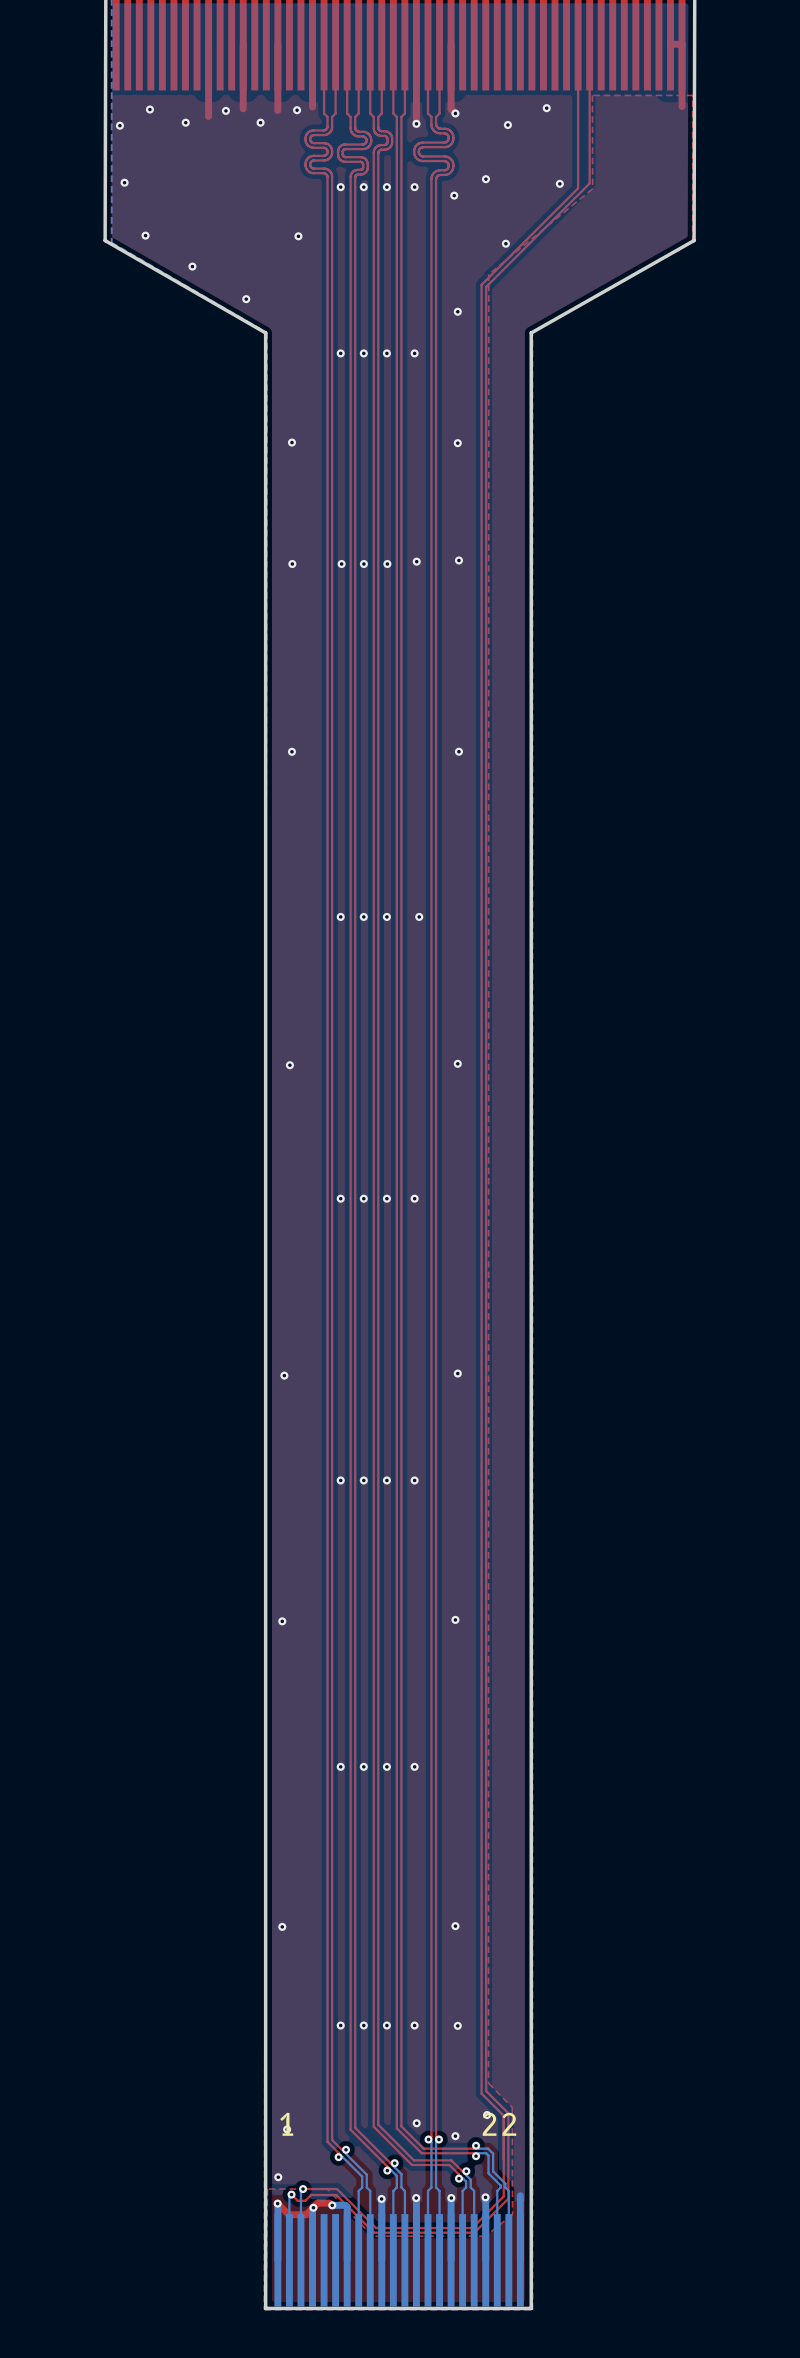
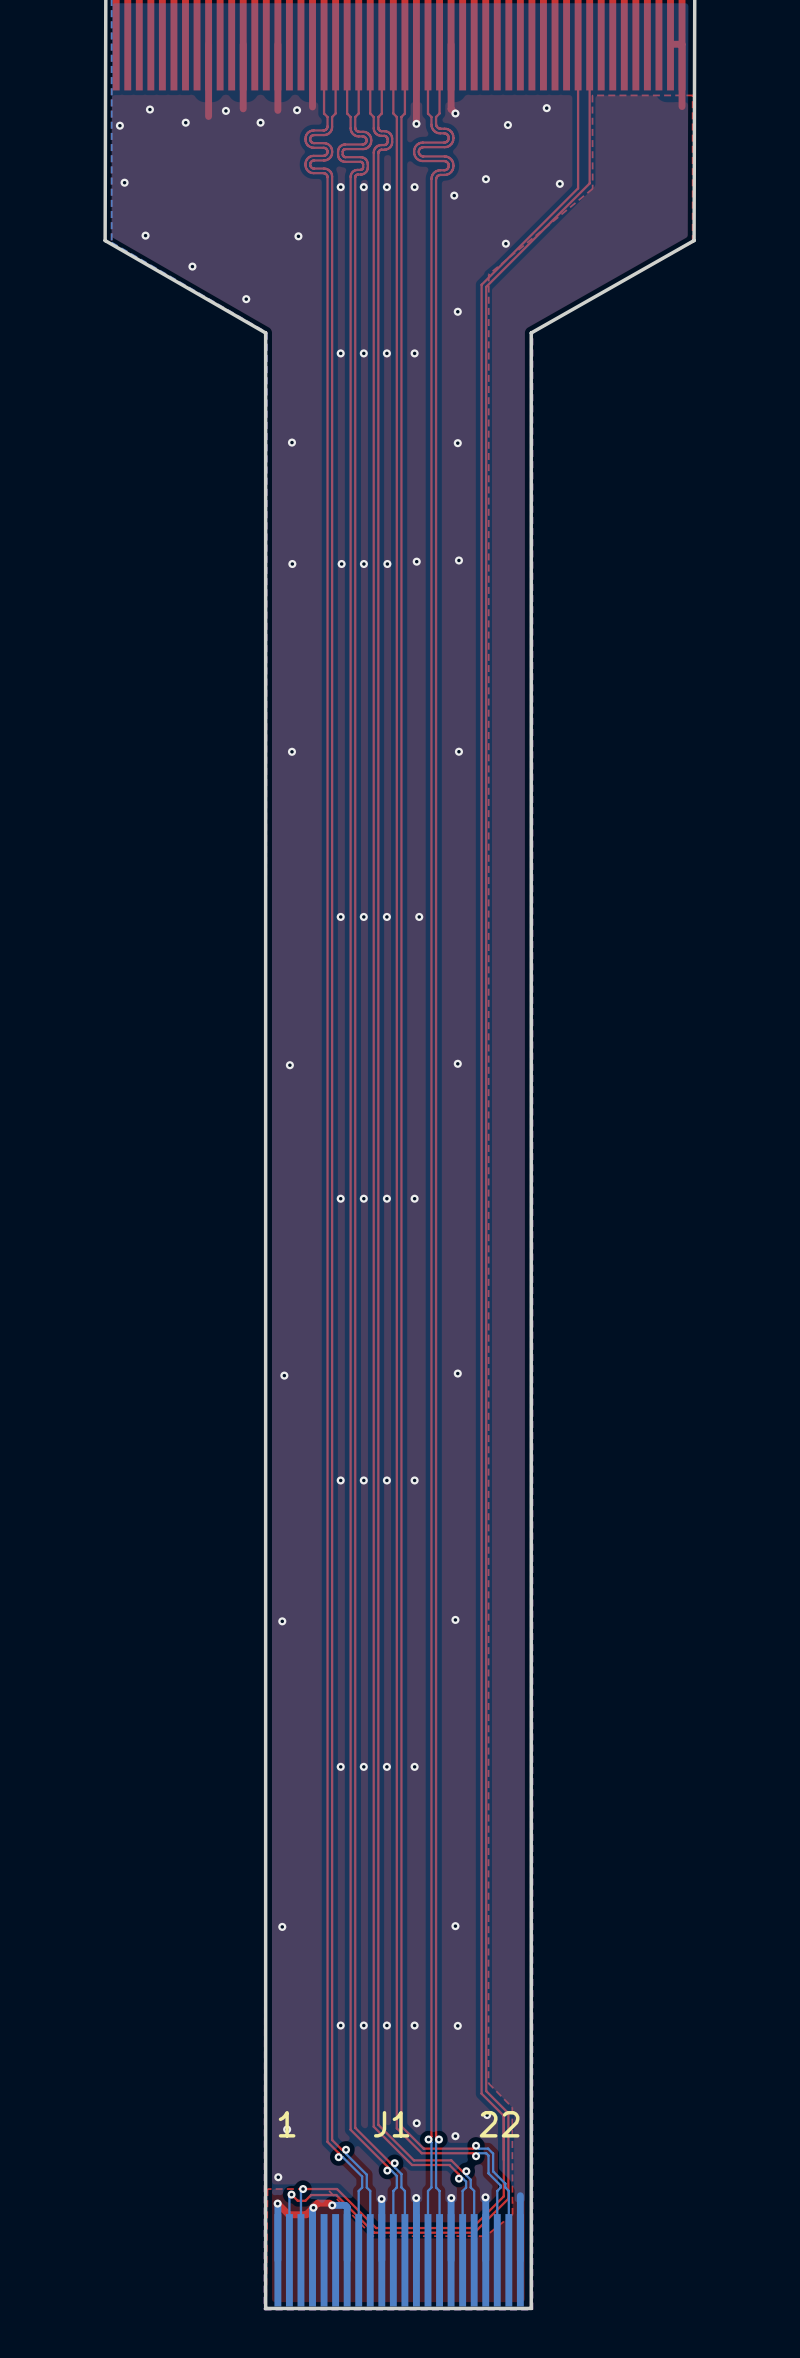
J1 name: none -> J1 (391, 2124)

